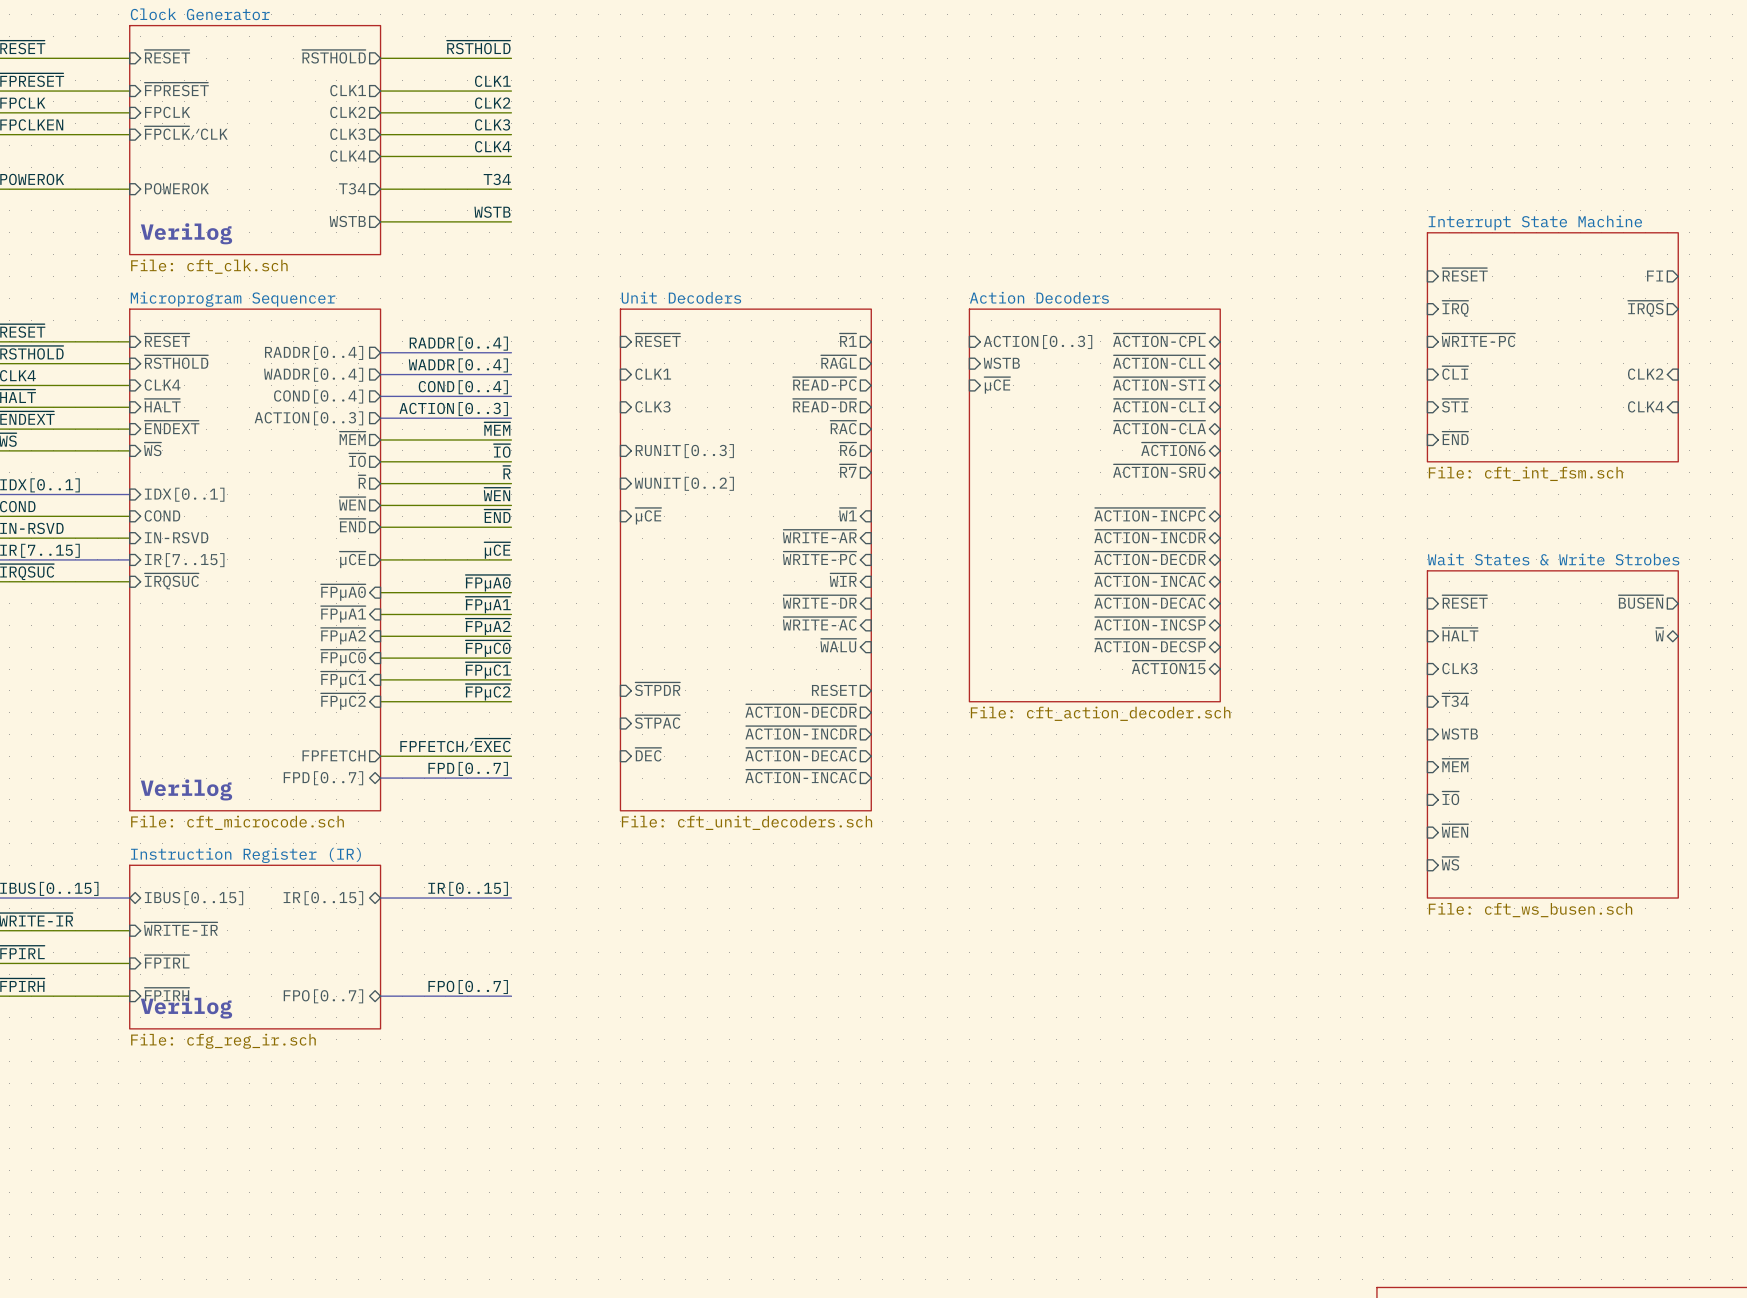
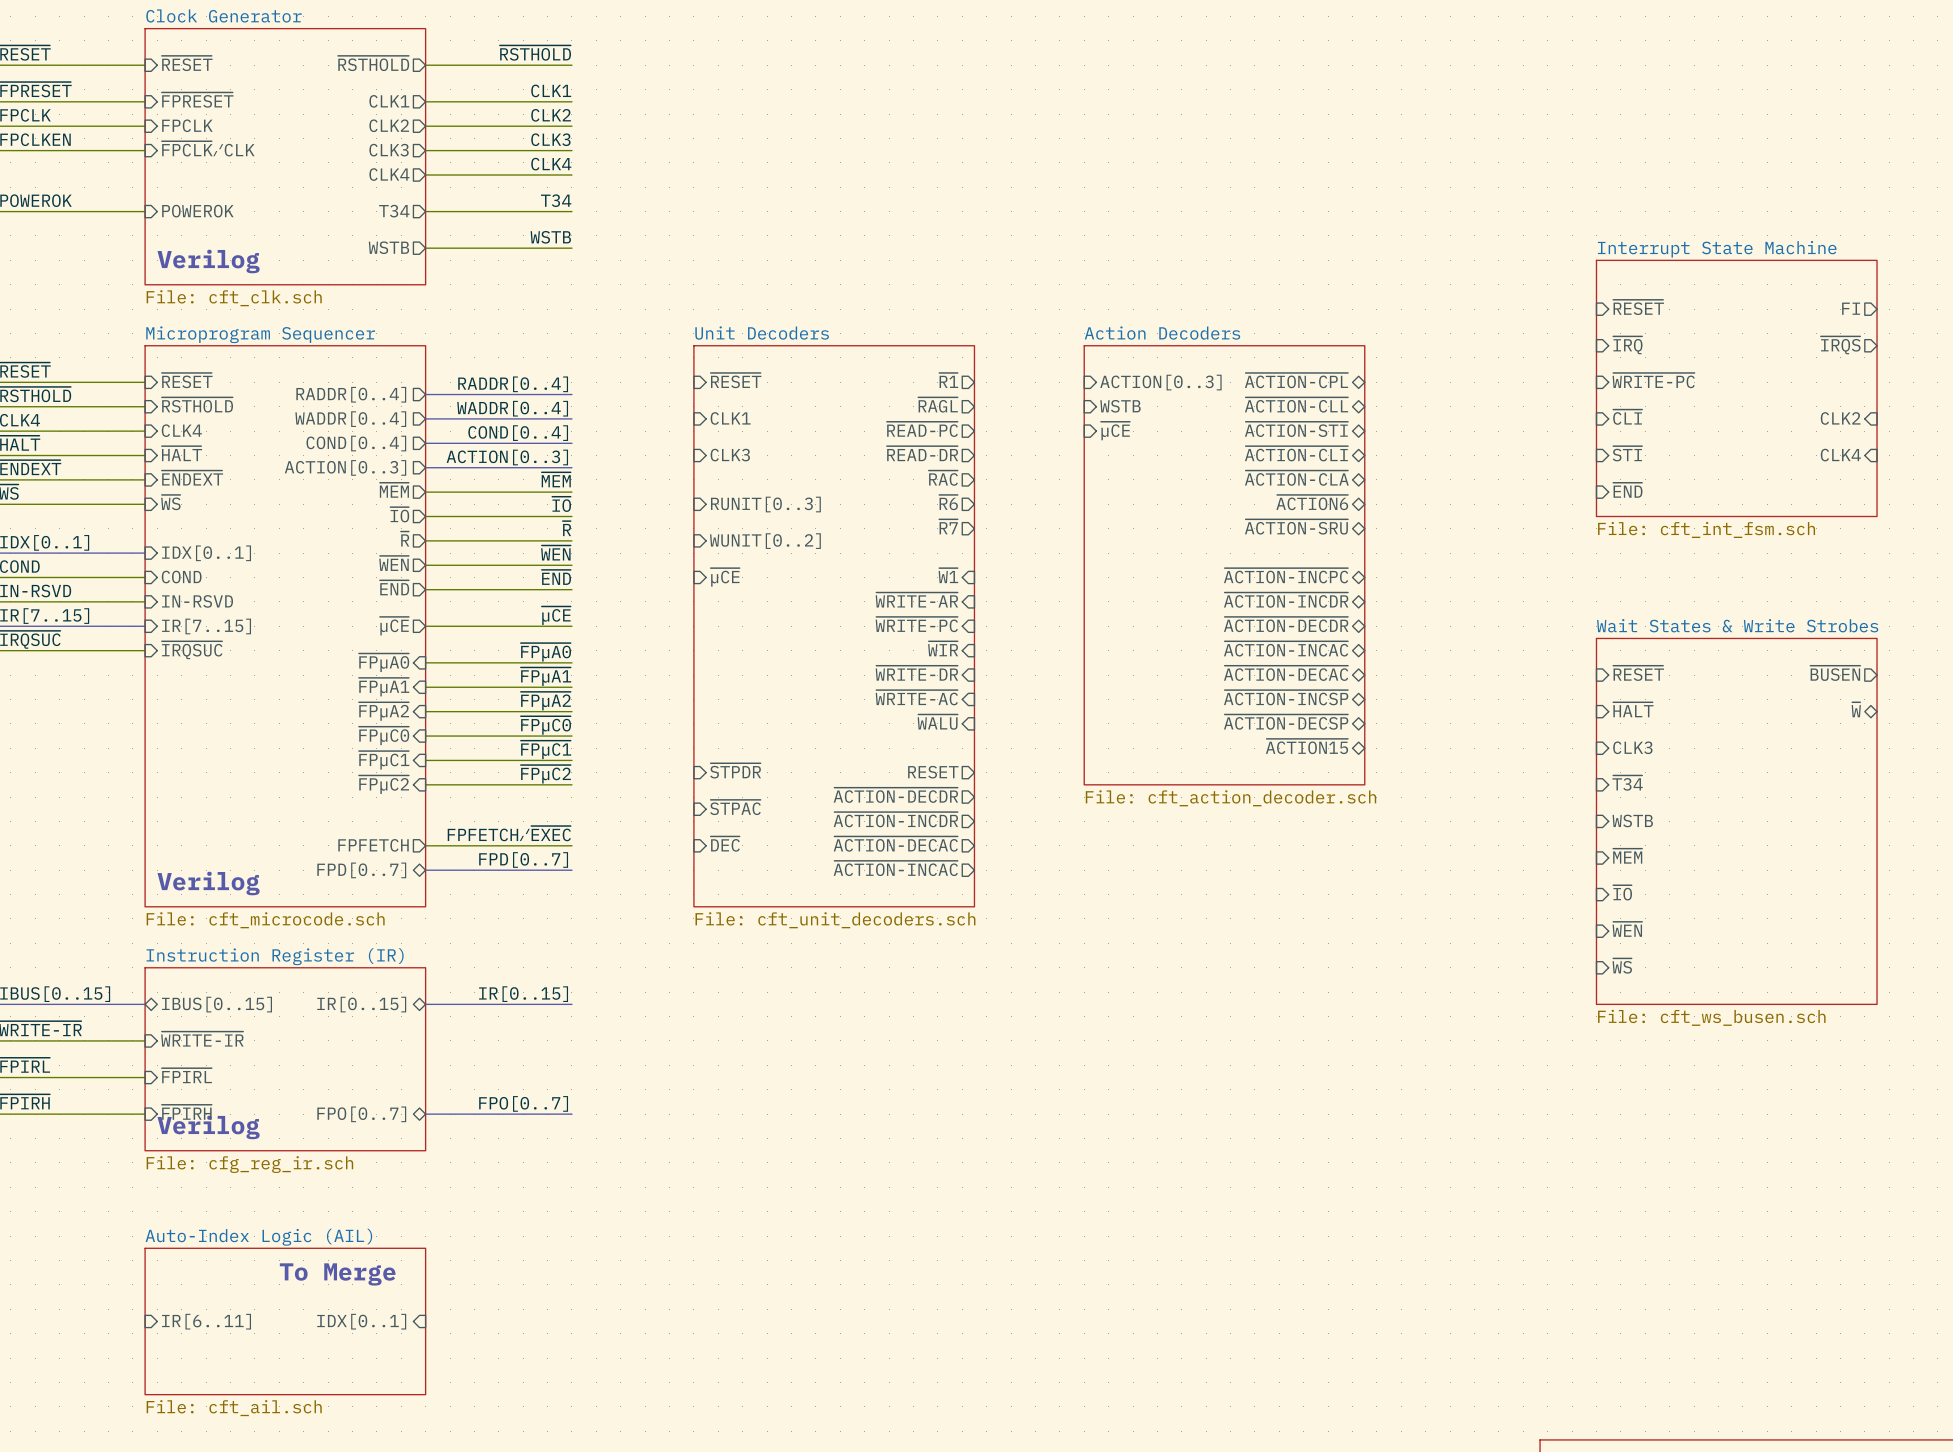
text: none -> To Merge (337, 1274)
sheet pin: none -> IR[6..11] (206, 1321)
sheet Auto-Index Logic (AIL): none -> File: cft_ail.sch (285, 1321)
sheet pin: none -> IDX[0..1] (361, 1321)

